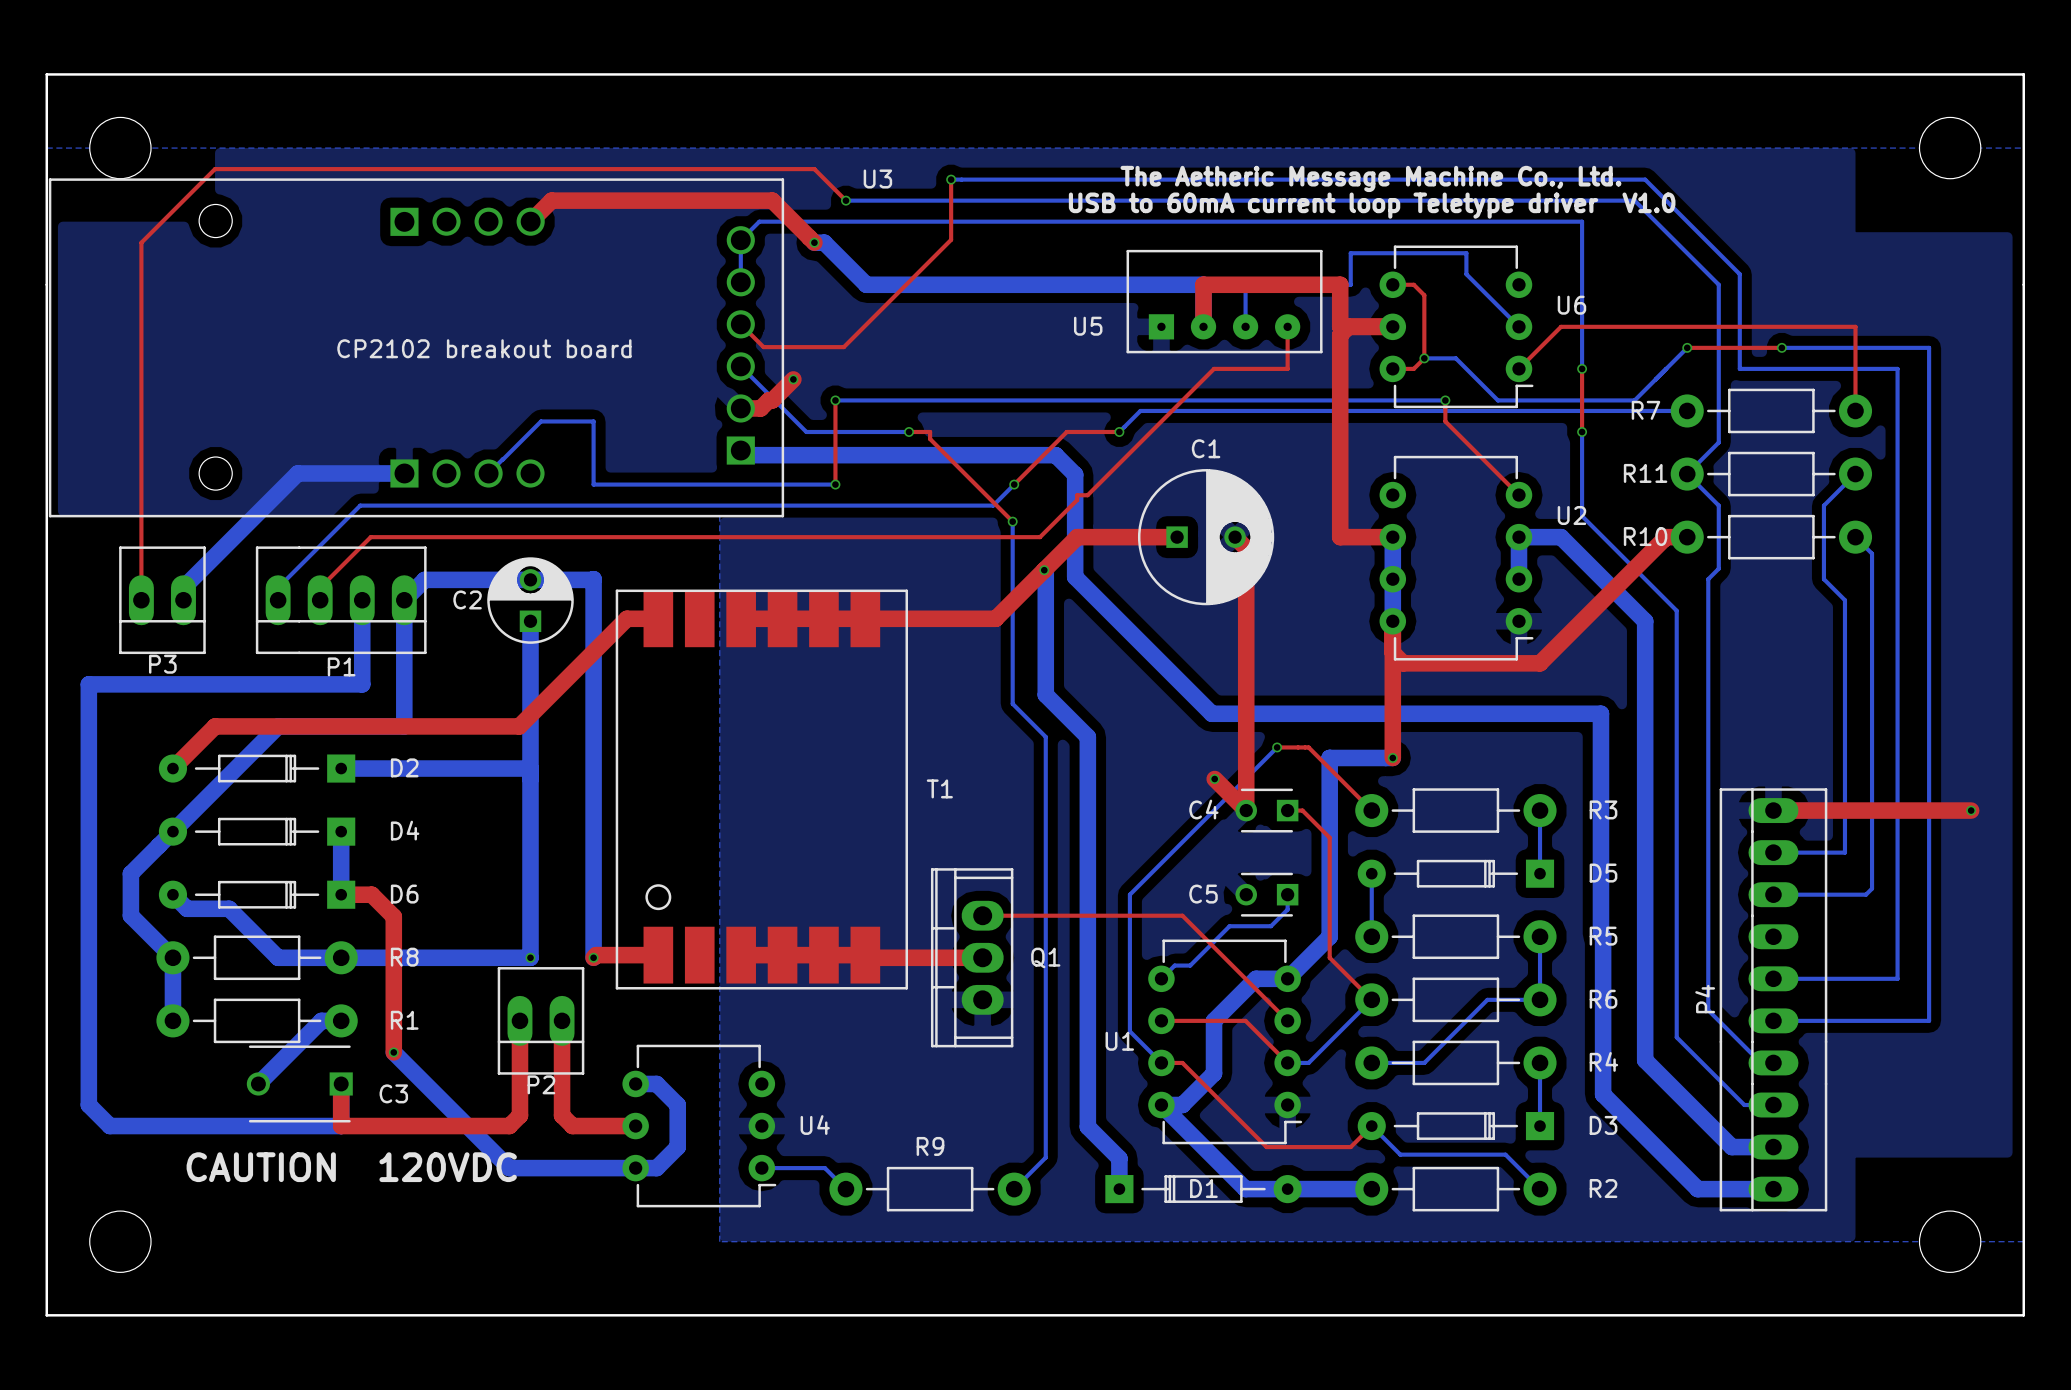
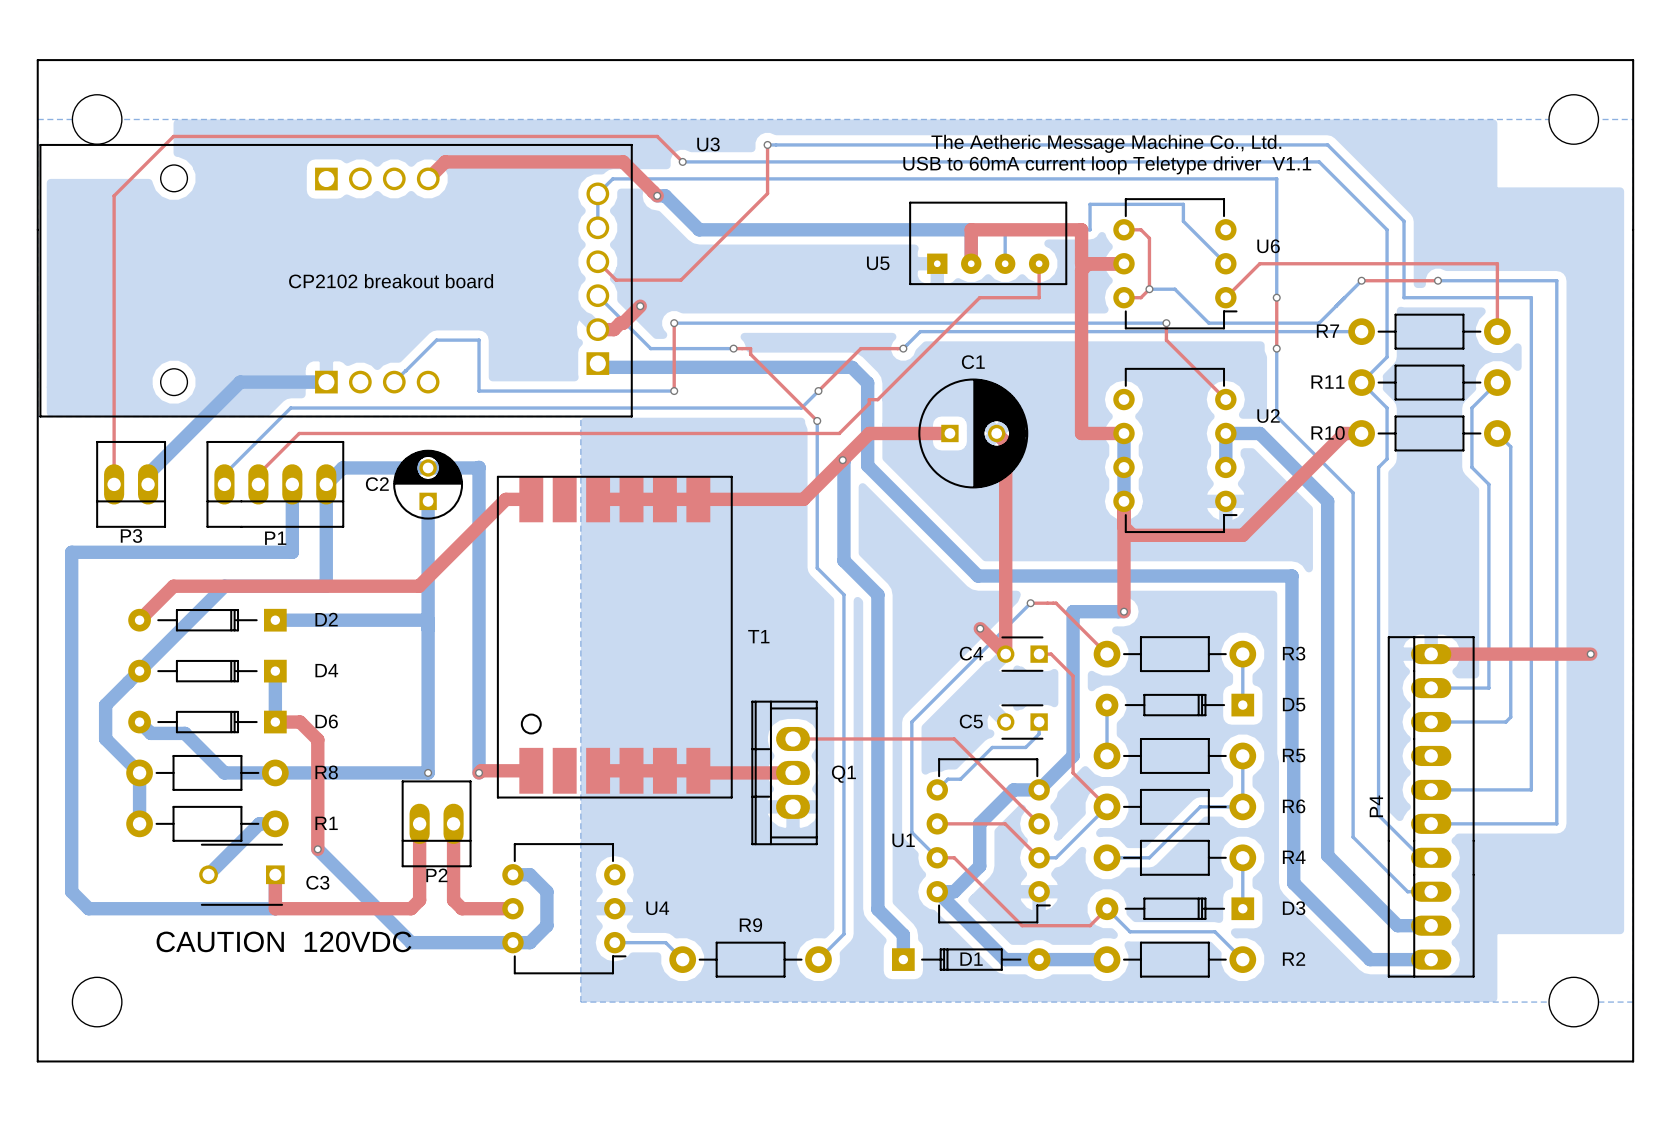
text: USB to 60mA current loop Teletype driver V1.0 (1372, 205) -> USB to 60mA current loop Teletype driver V1.1 (1107, 165)

